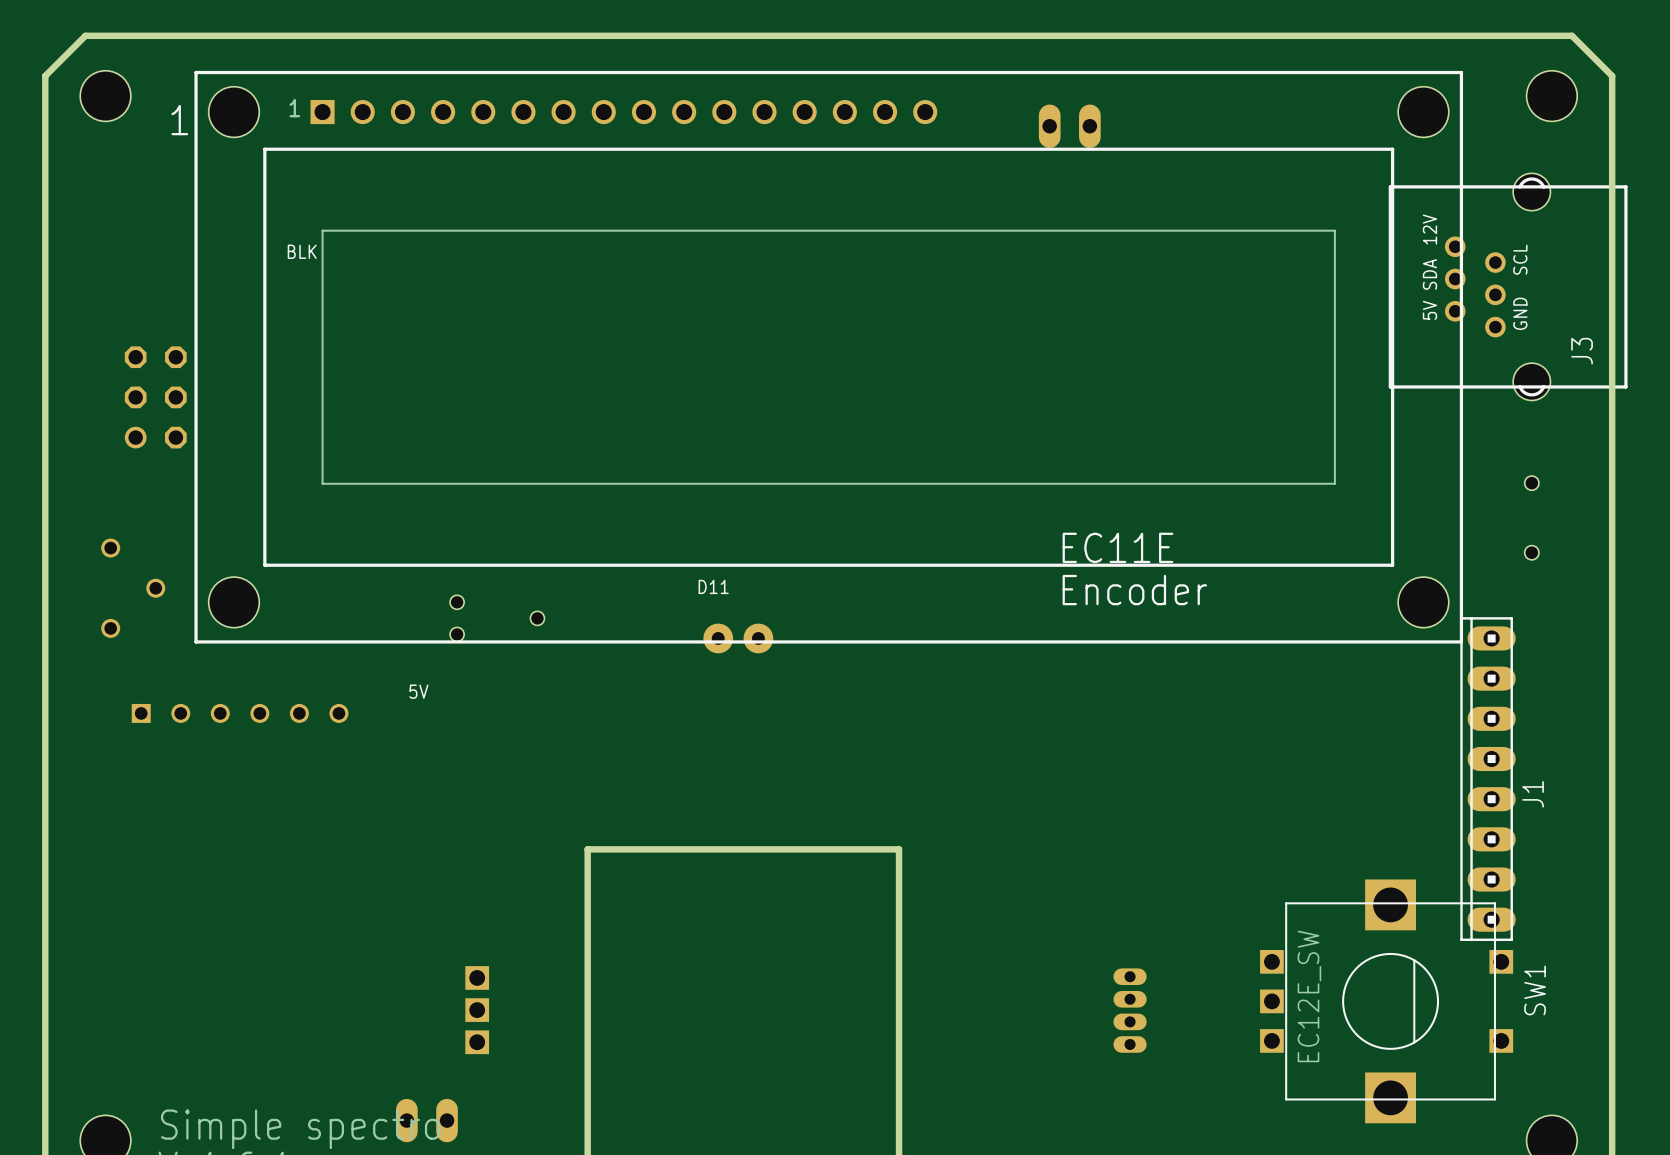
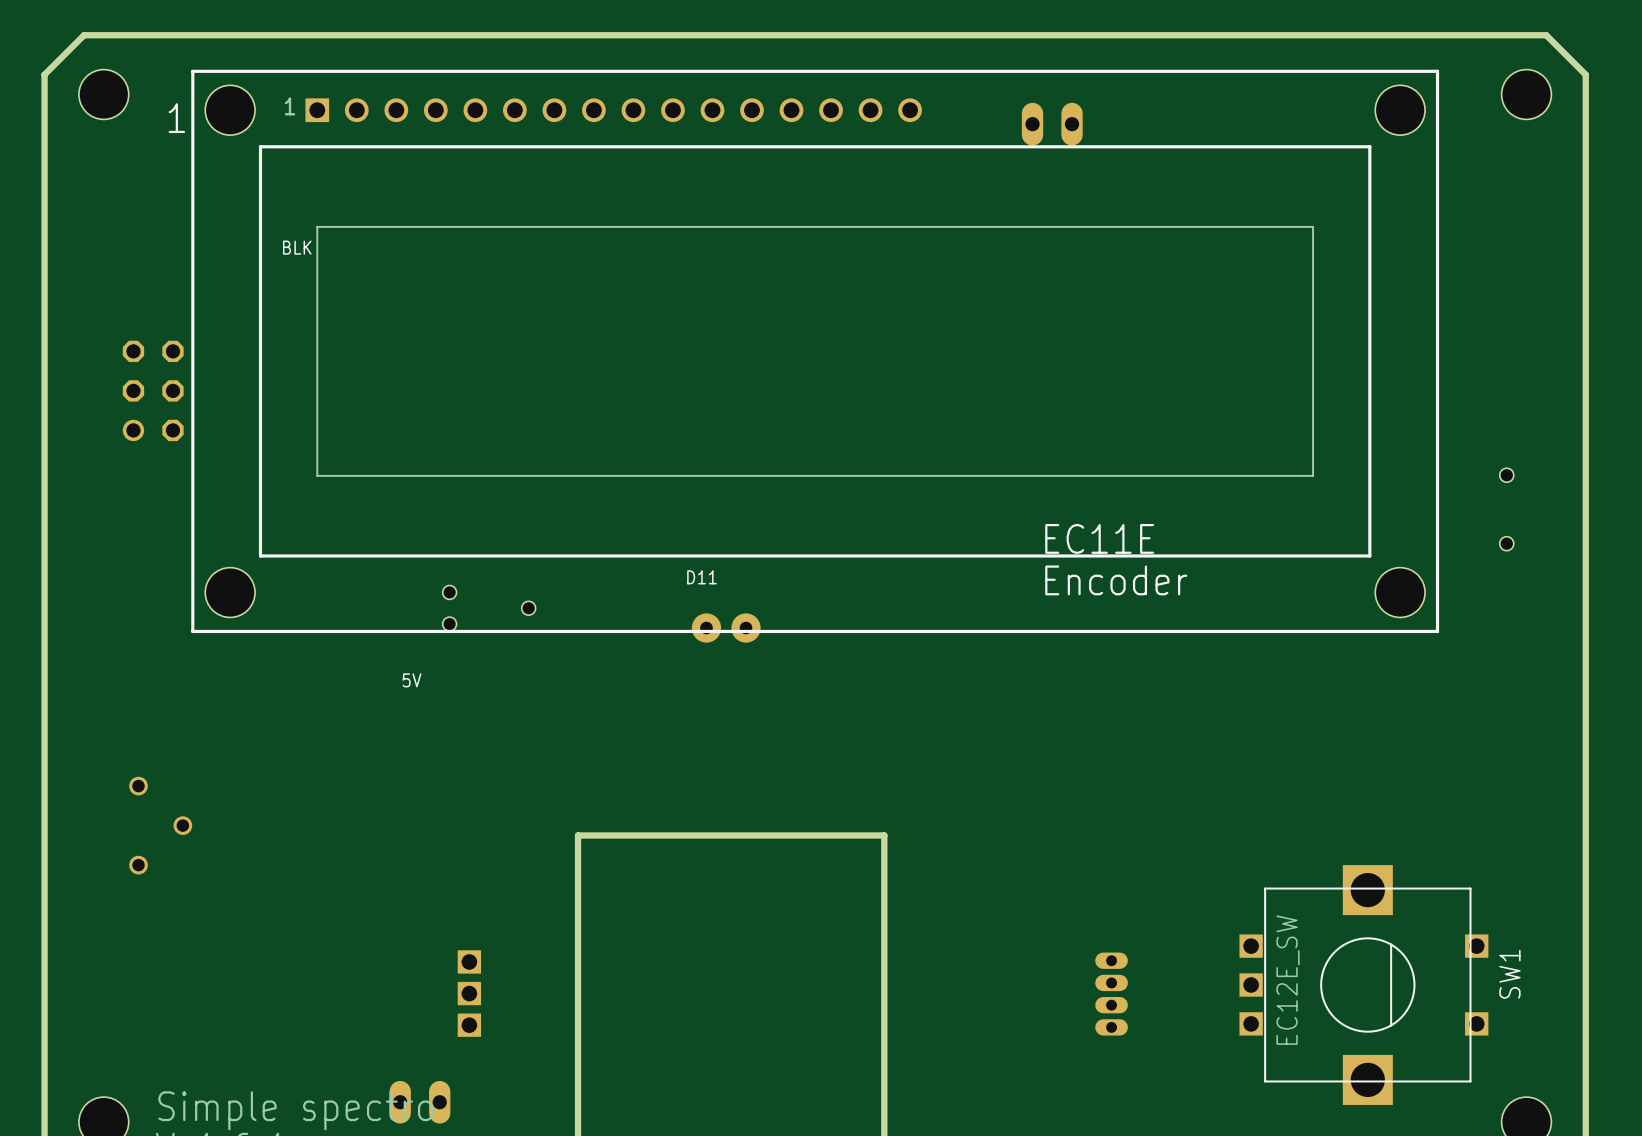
J3: (1508, 286) -> none
part position: (133, 588) -> (160, 825)
part: (240, 713) -> none
J1: (1488, 779) -> none

